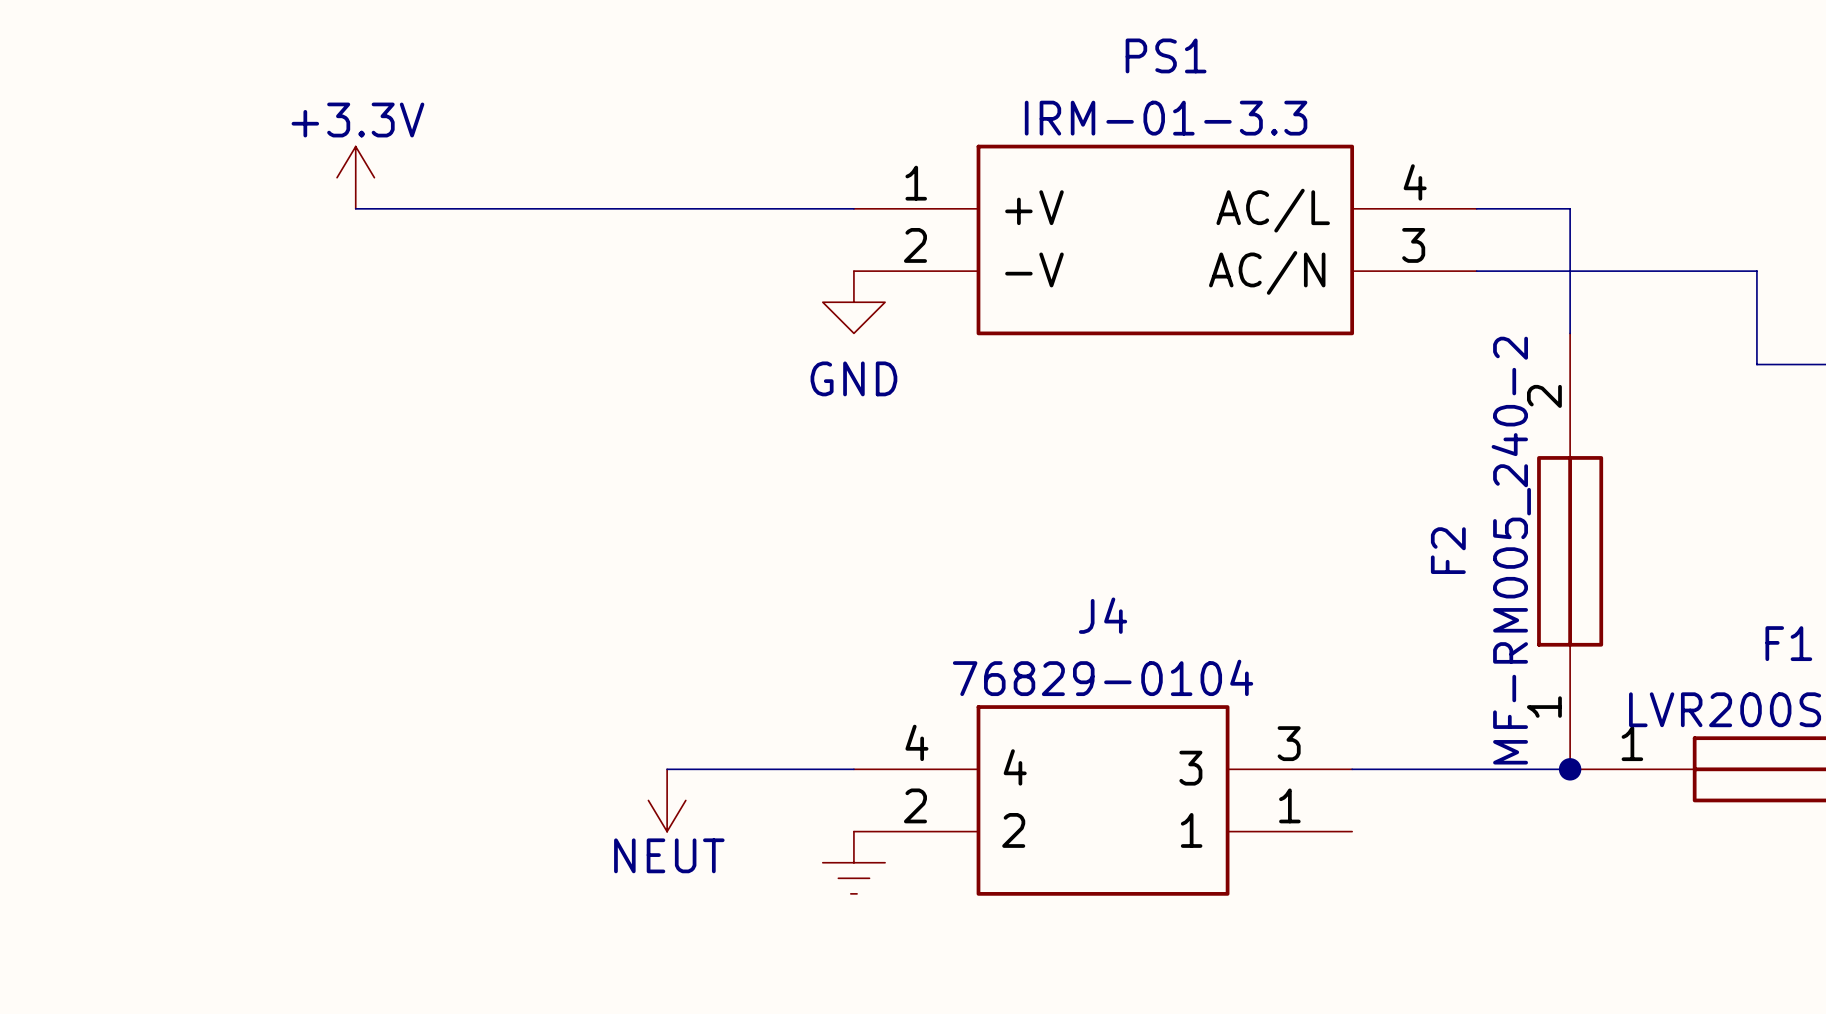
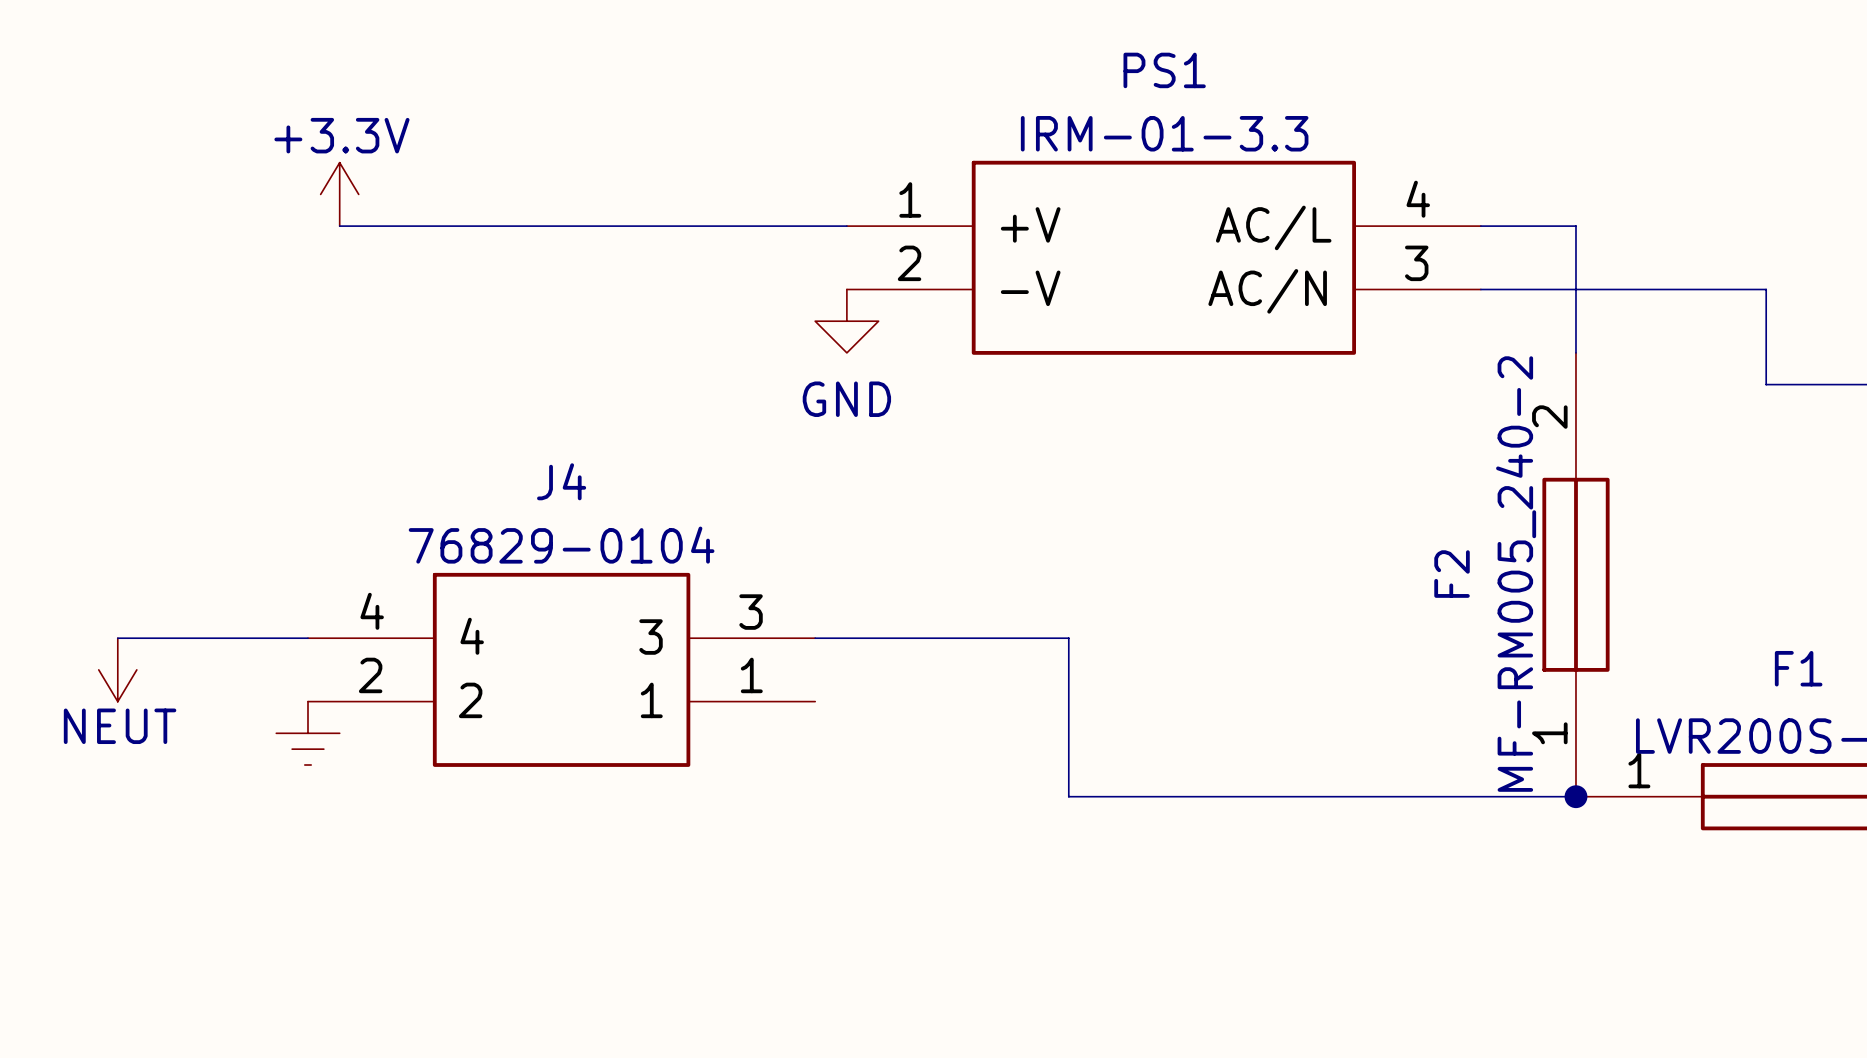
wire: none -> (815, 638) (1068, 638) (1068, 796) (1354, 796)
wire: (667, 769) (853, 769) -> (117, 638) (307, 638)
power symbol position: NEUT (667, 800) -> NEUT (117, 669)
J4 position: (1103, 800) -> (561, 669)
power symbol position: (853, 862) -> (307, 733)

